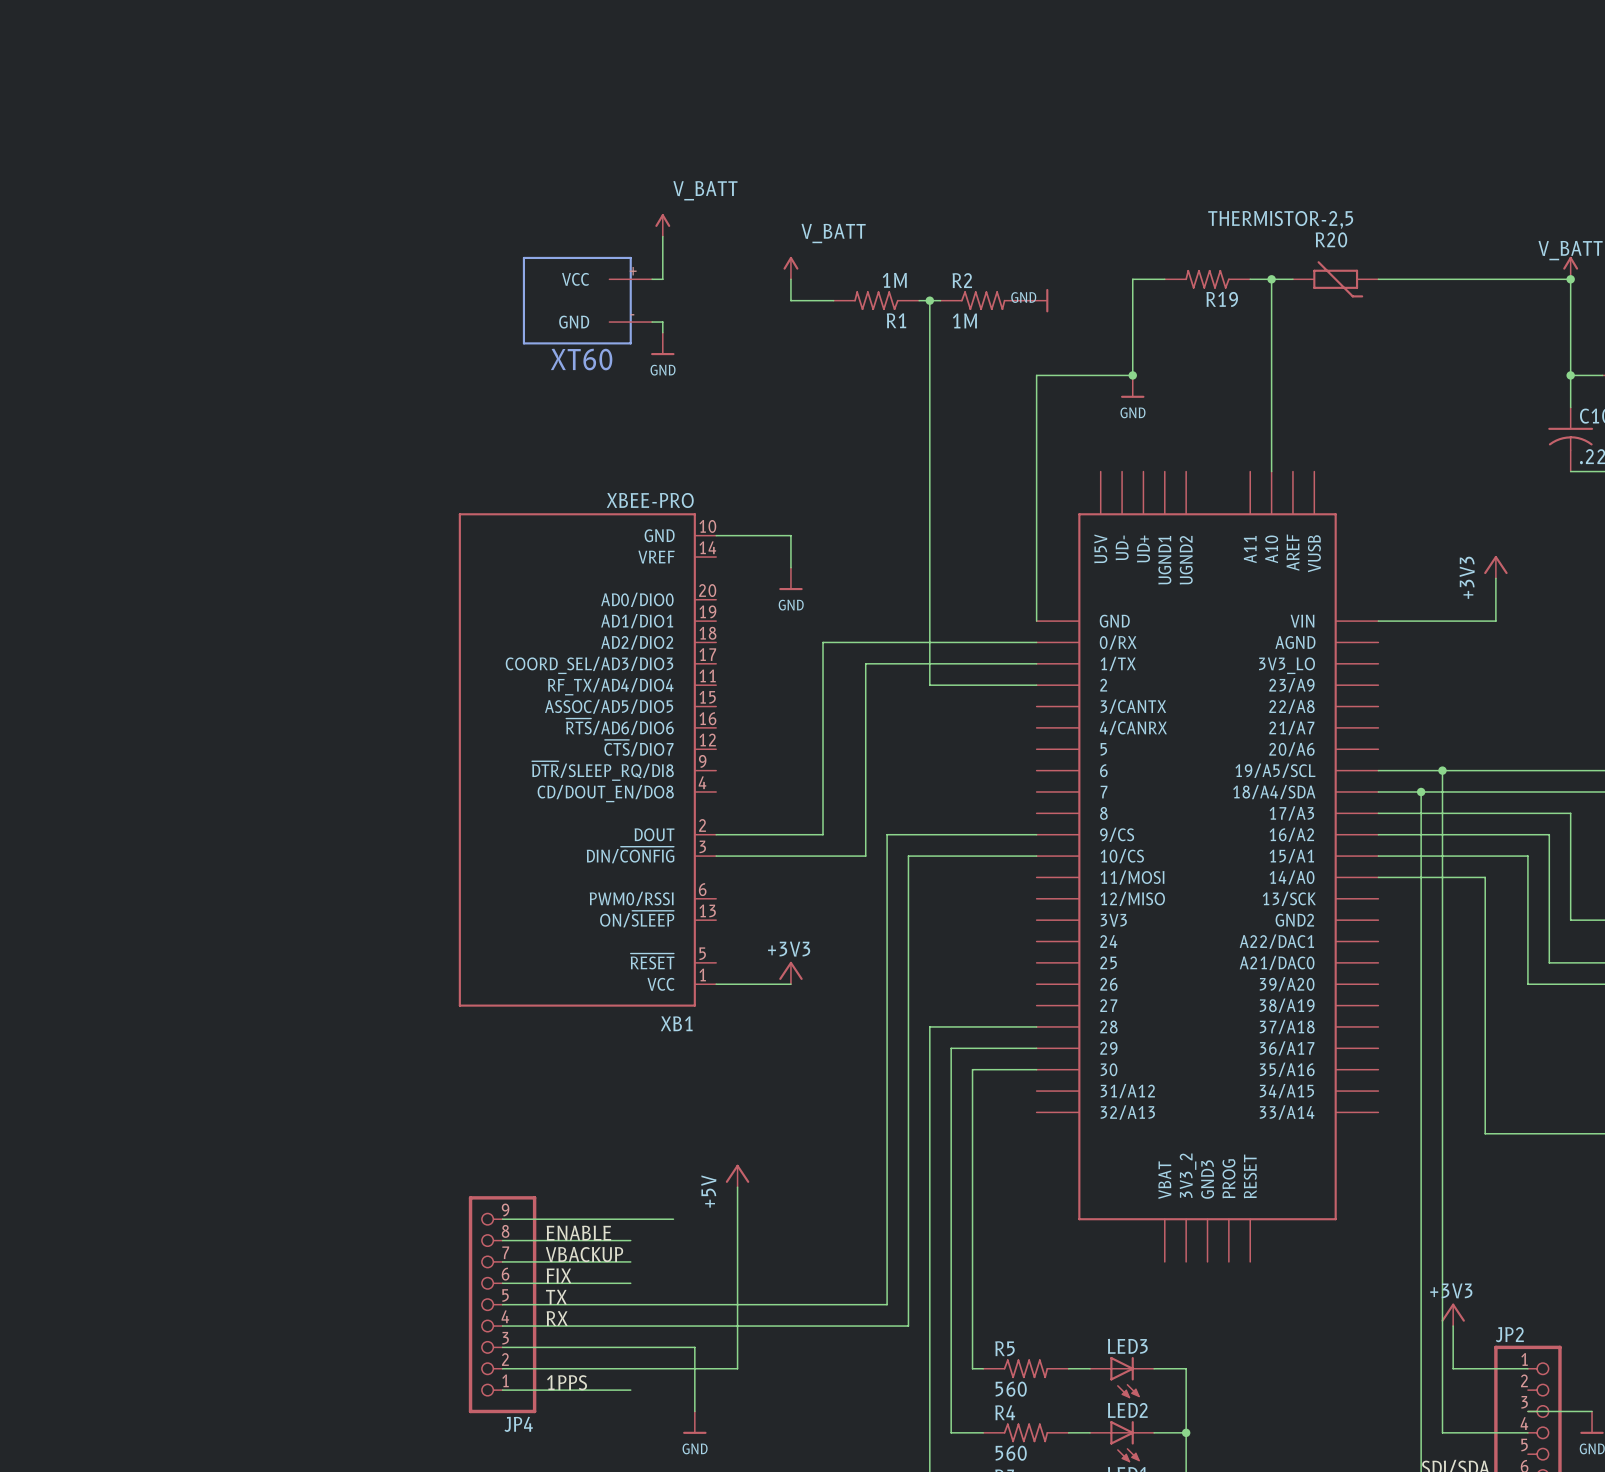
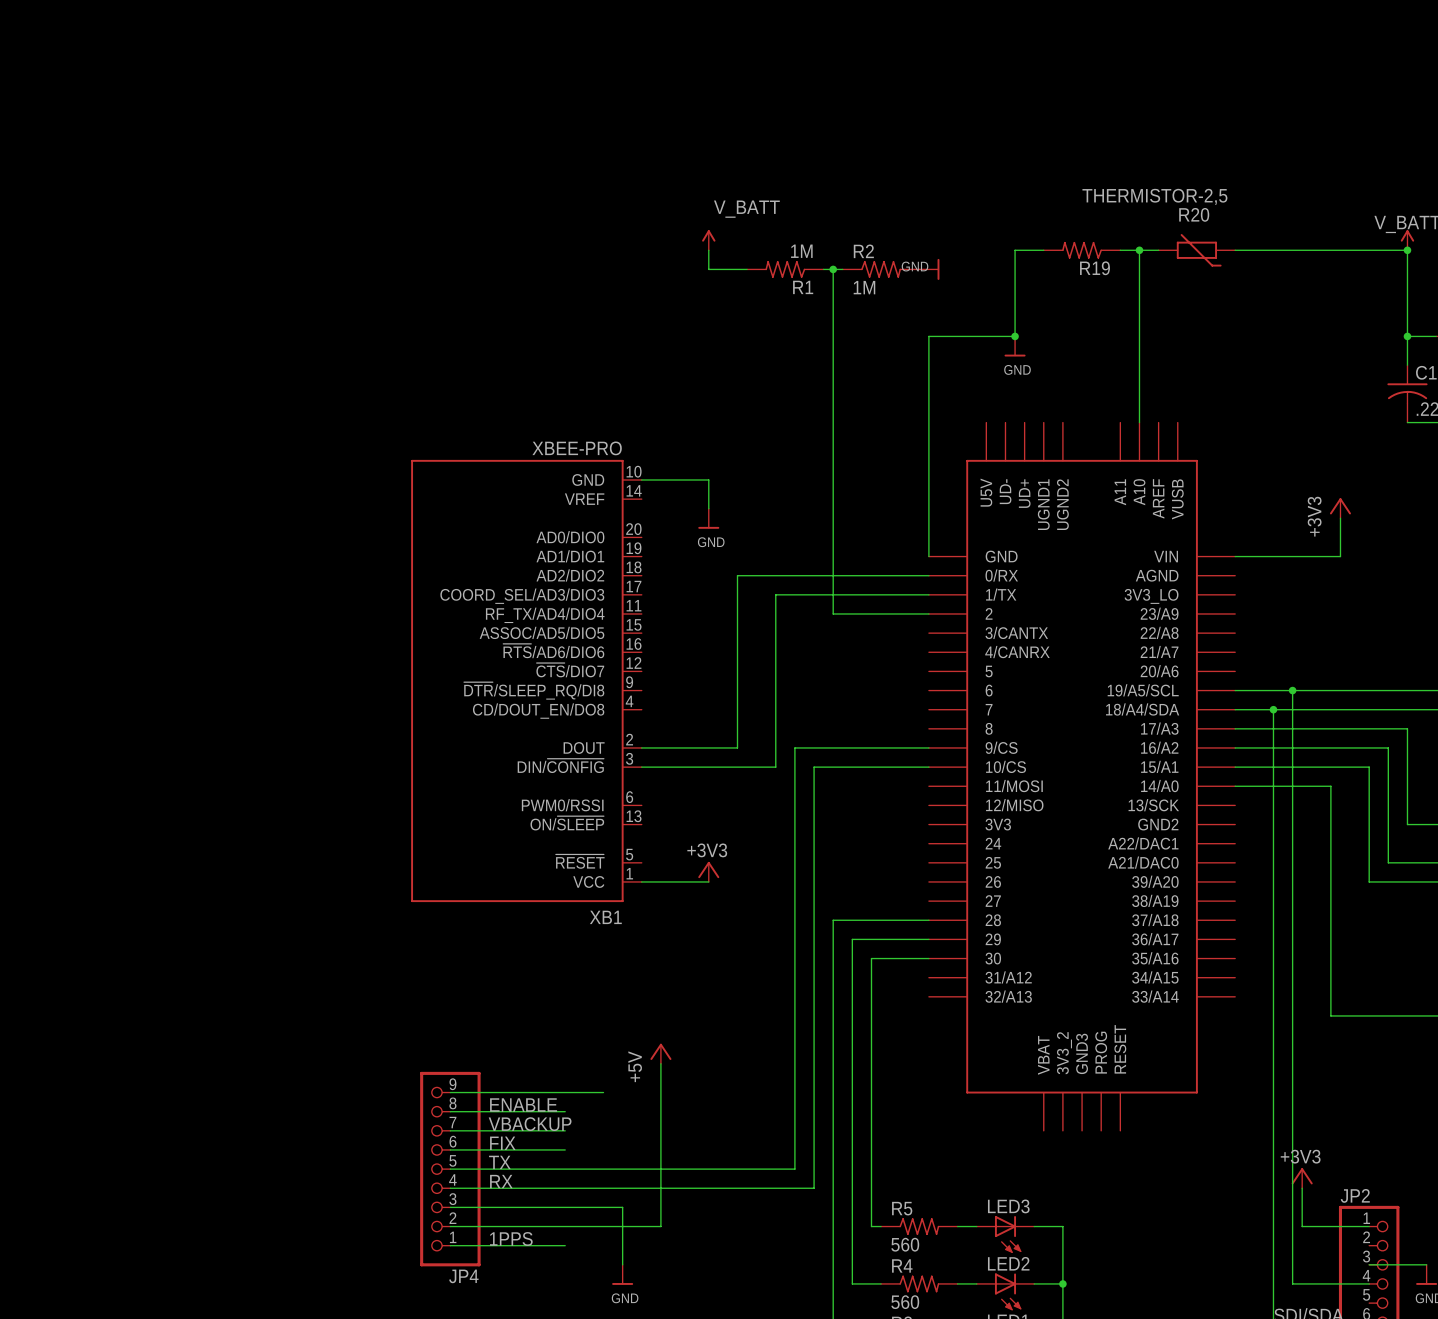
power symbol: V_BATT (662, 225) -> none
wire: (662, 236) (662, 279) (652, 279) -> none
part: (587, 300) -> none
wire: (652, 322) (662, 322) (662, 332) -> none
power symbol: GND (662, 343) -> none

